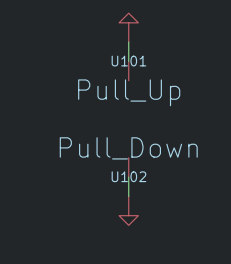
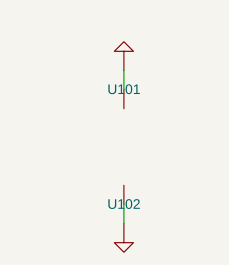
U101 value: Pull_Up (129, 92) -> none
U102 value: Pull_Down (128, 148) -> none

